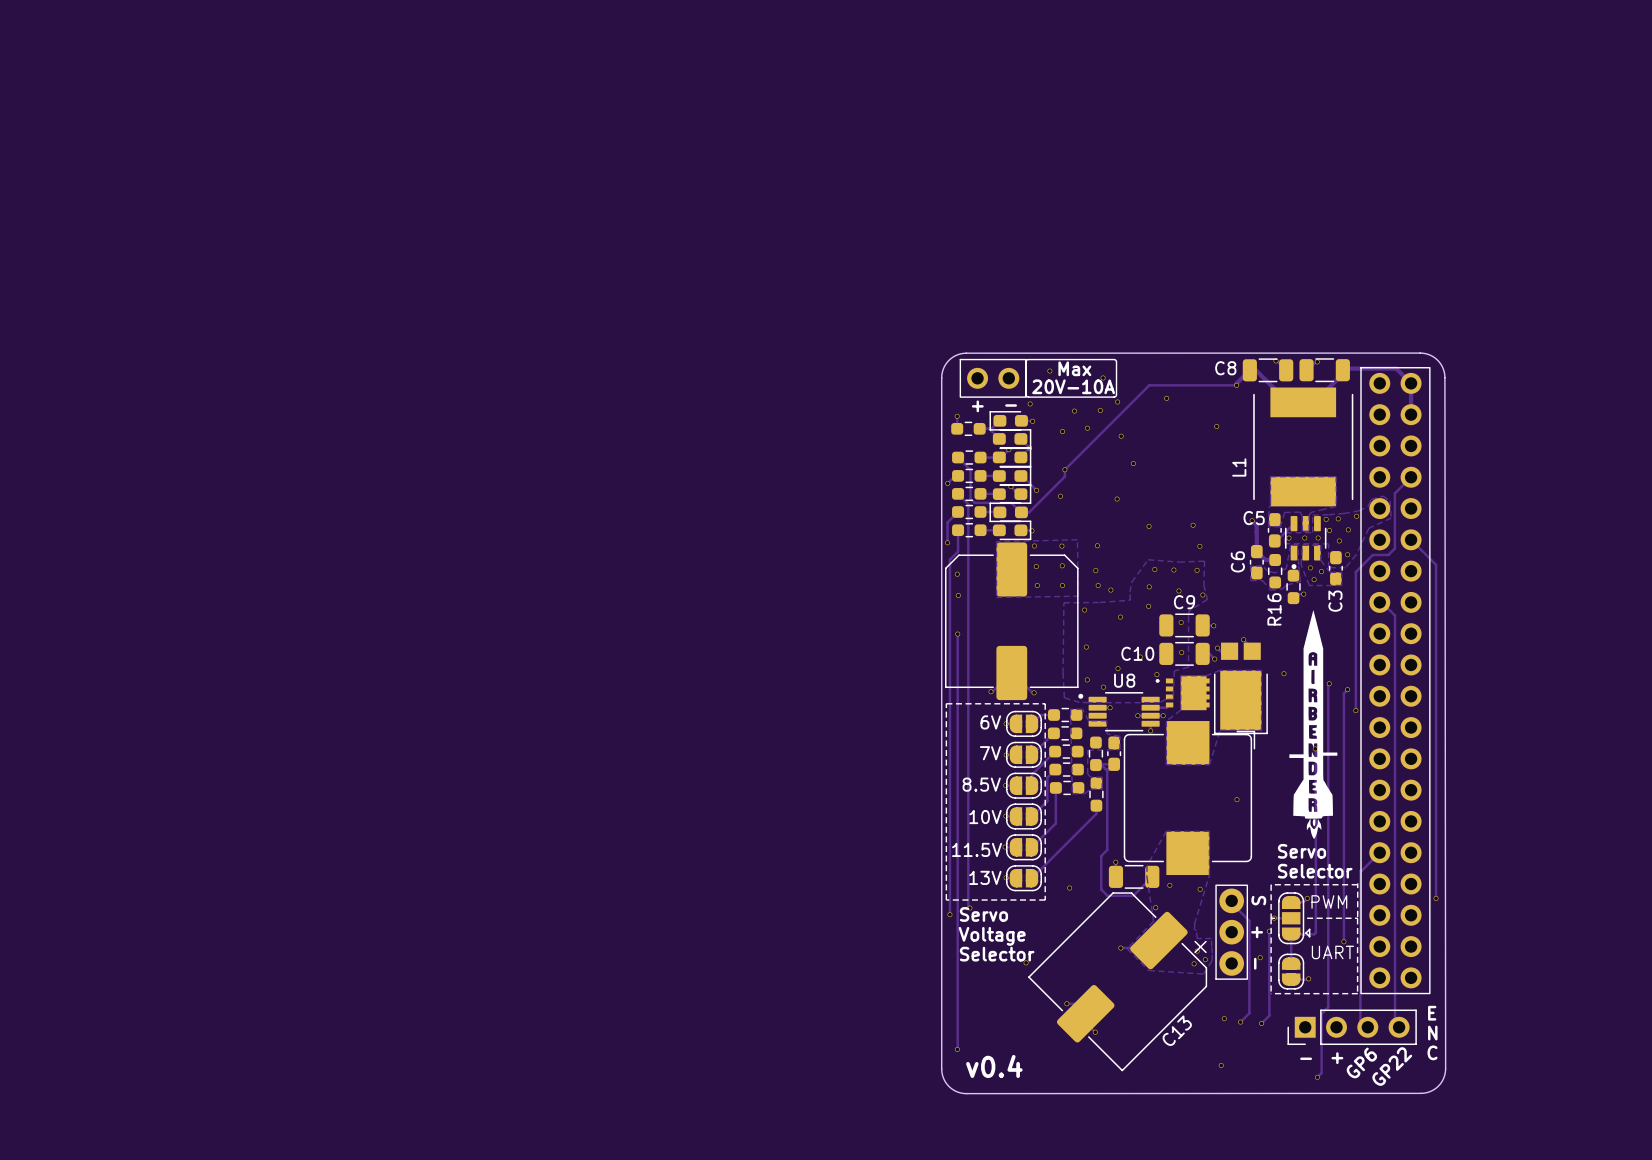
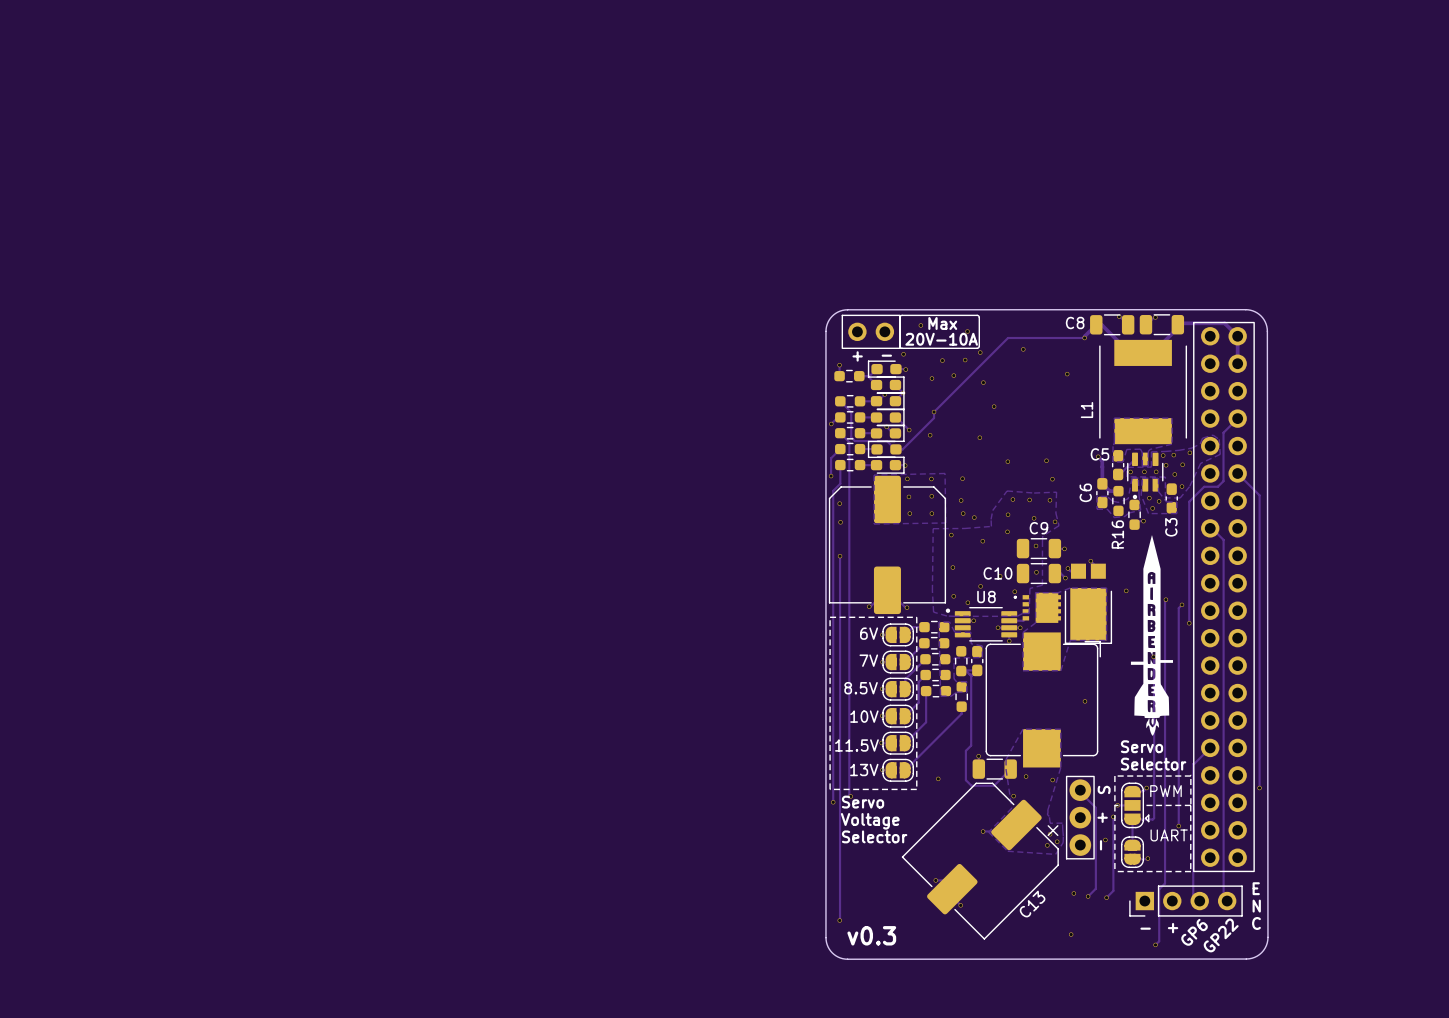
via: (1026, 962) -> none
text: v0.4 (994, 1066) -> v0.3 (871, 935)

